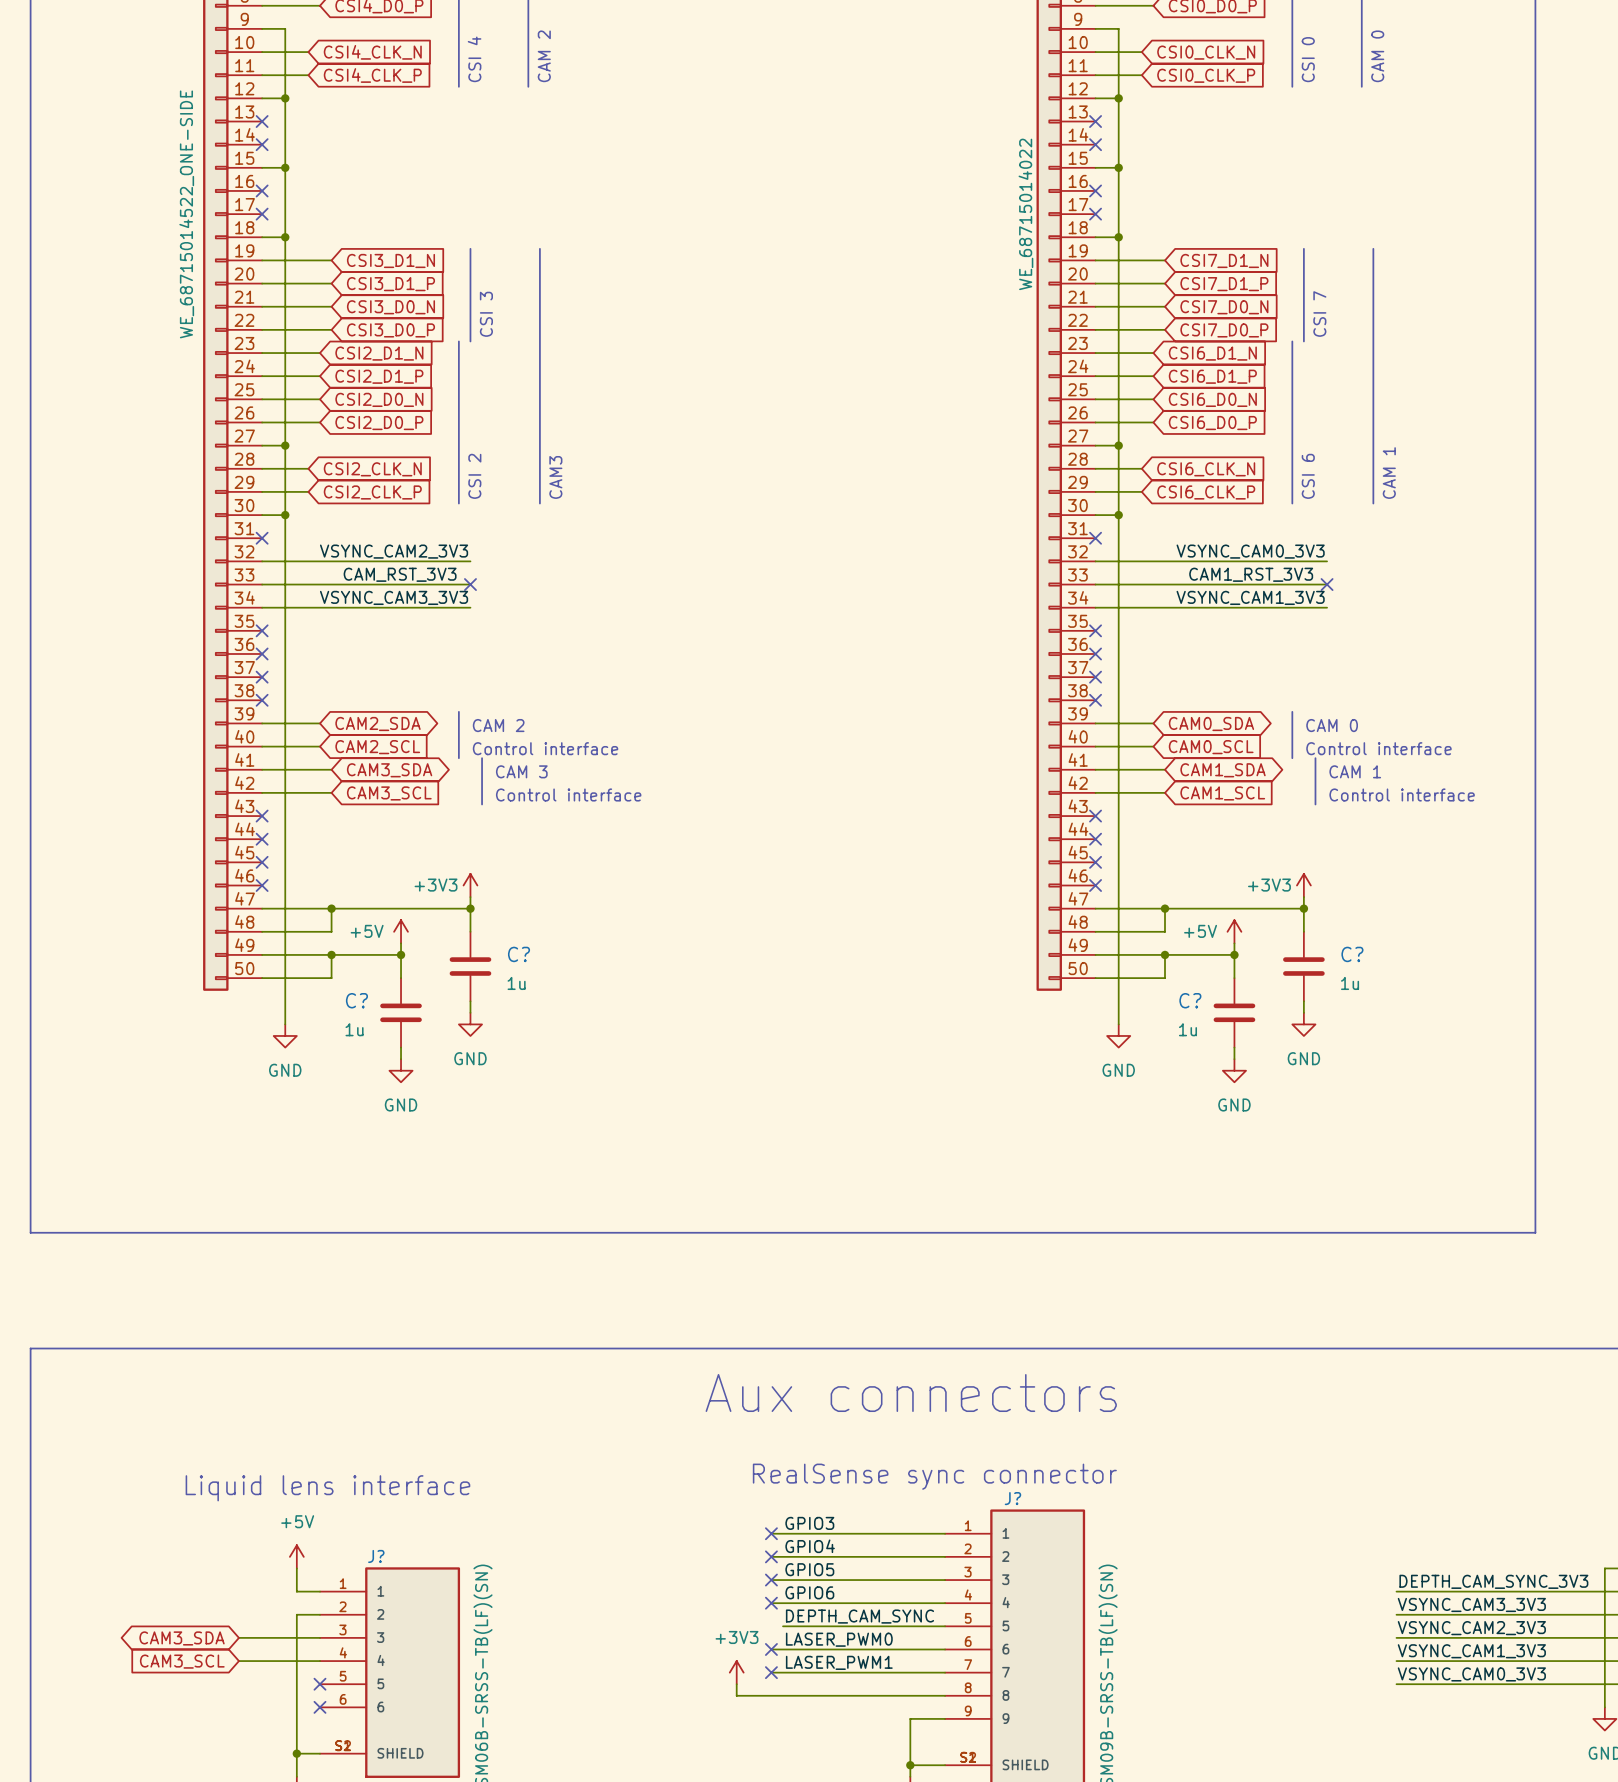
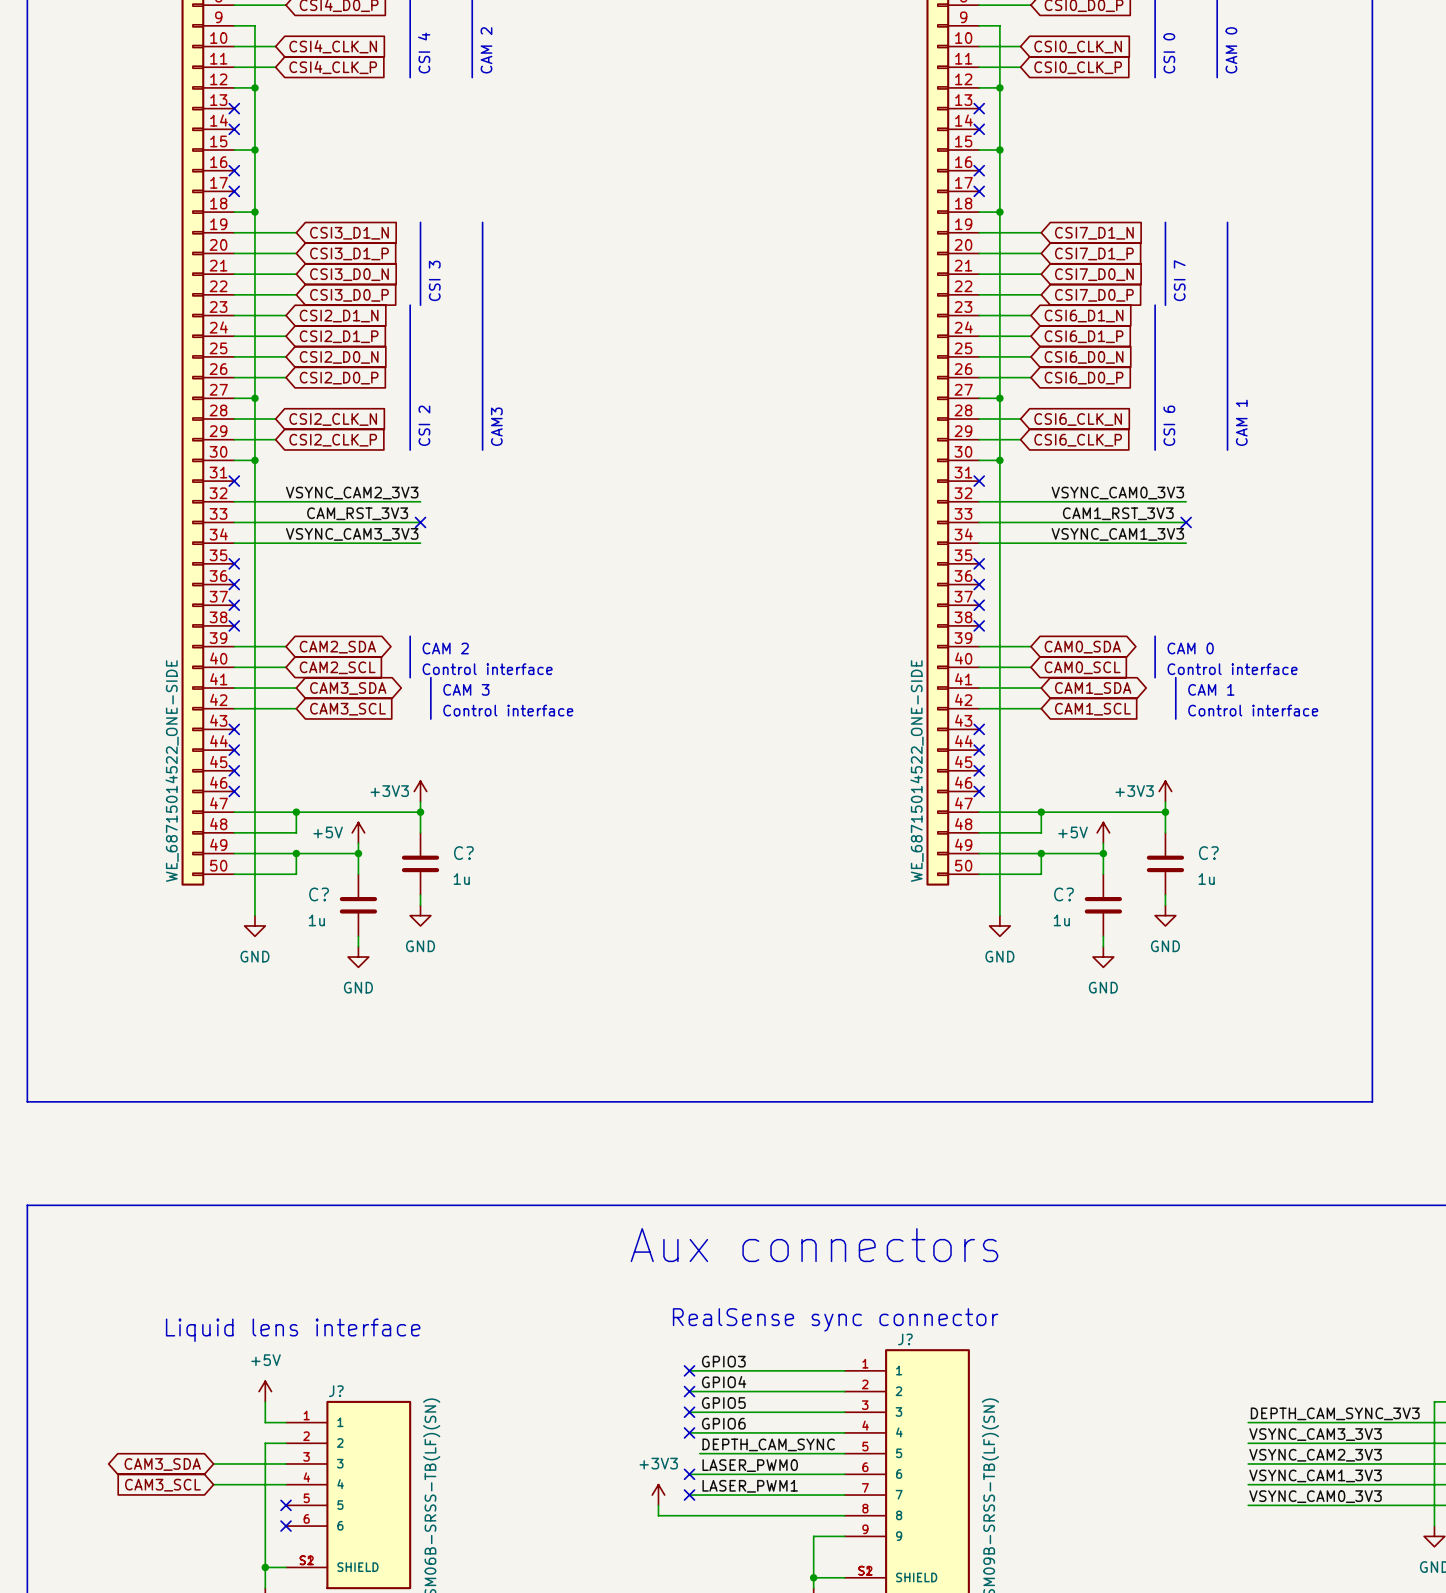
part value position: WE_68715014522_ONE-SIDE (186, 214) -> WE_68715014522_ONE-SIDE (172, 771)
part value: WE_68715014022 (1025, 214) -> WE_68715014522_ONE-SIDE (916, 771)

